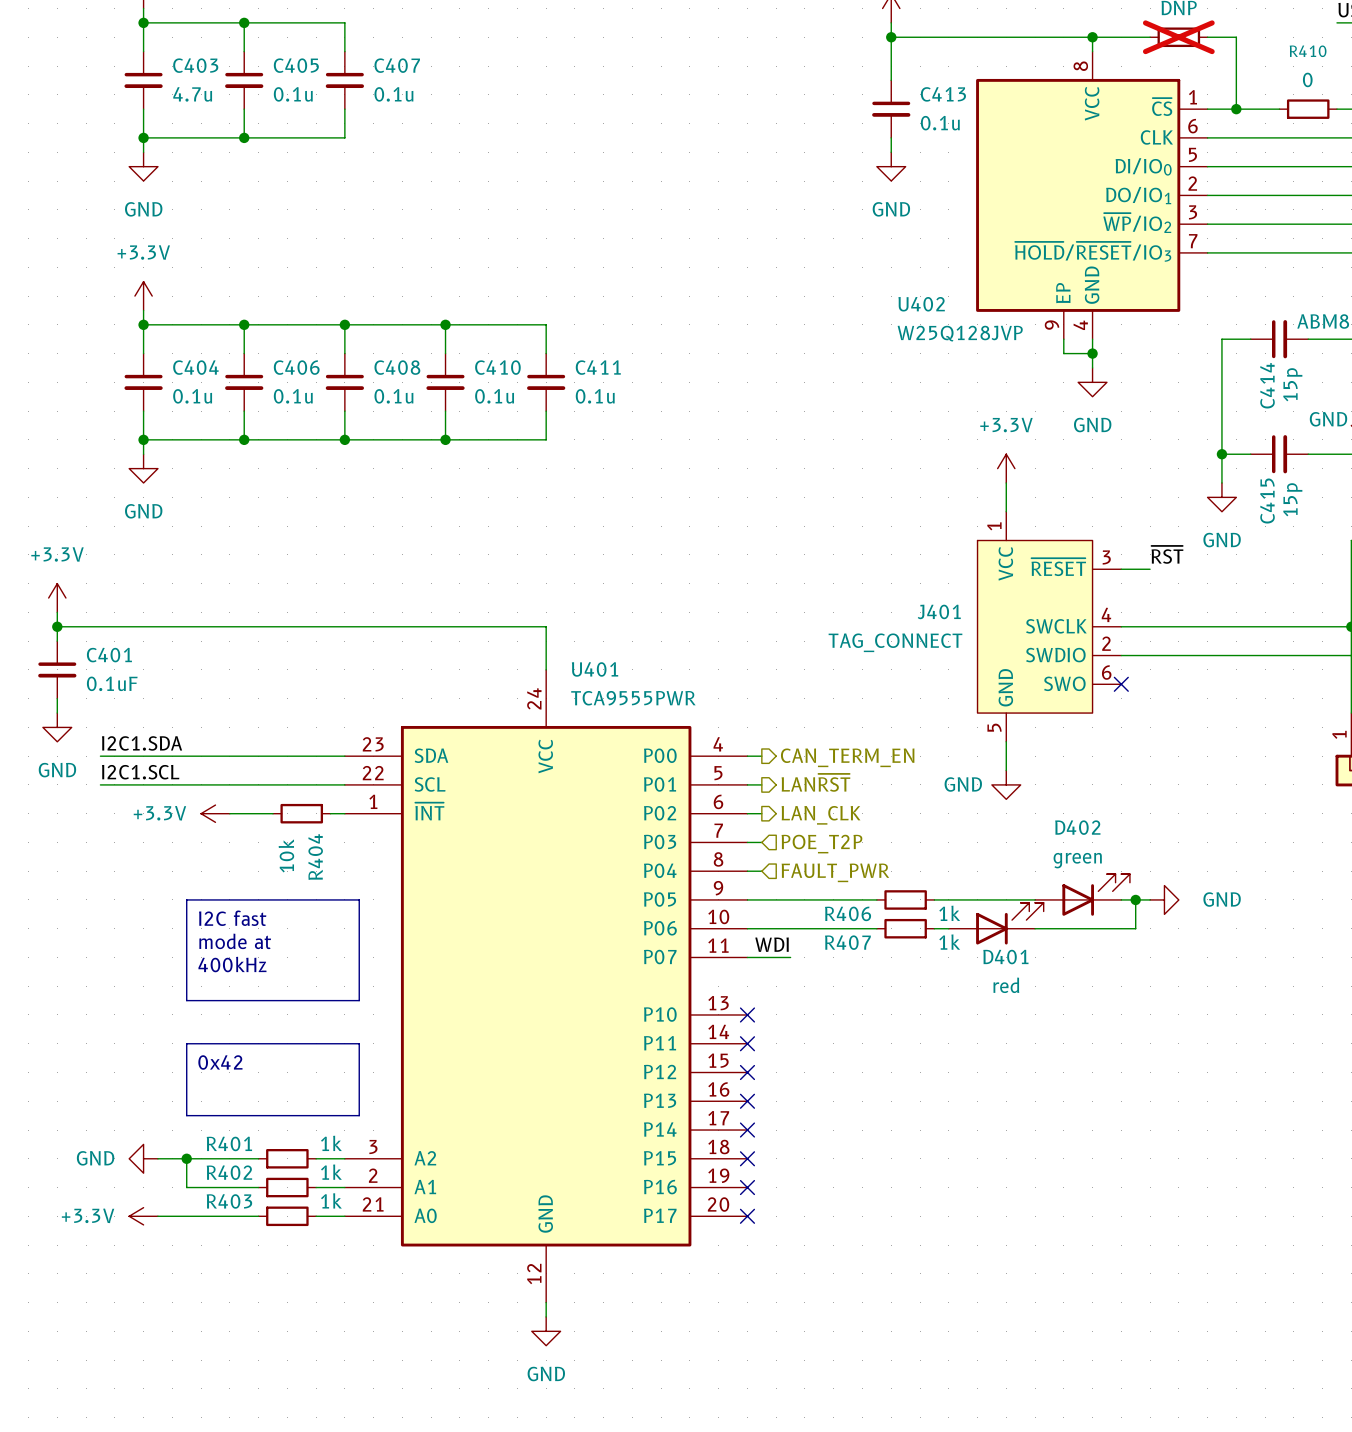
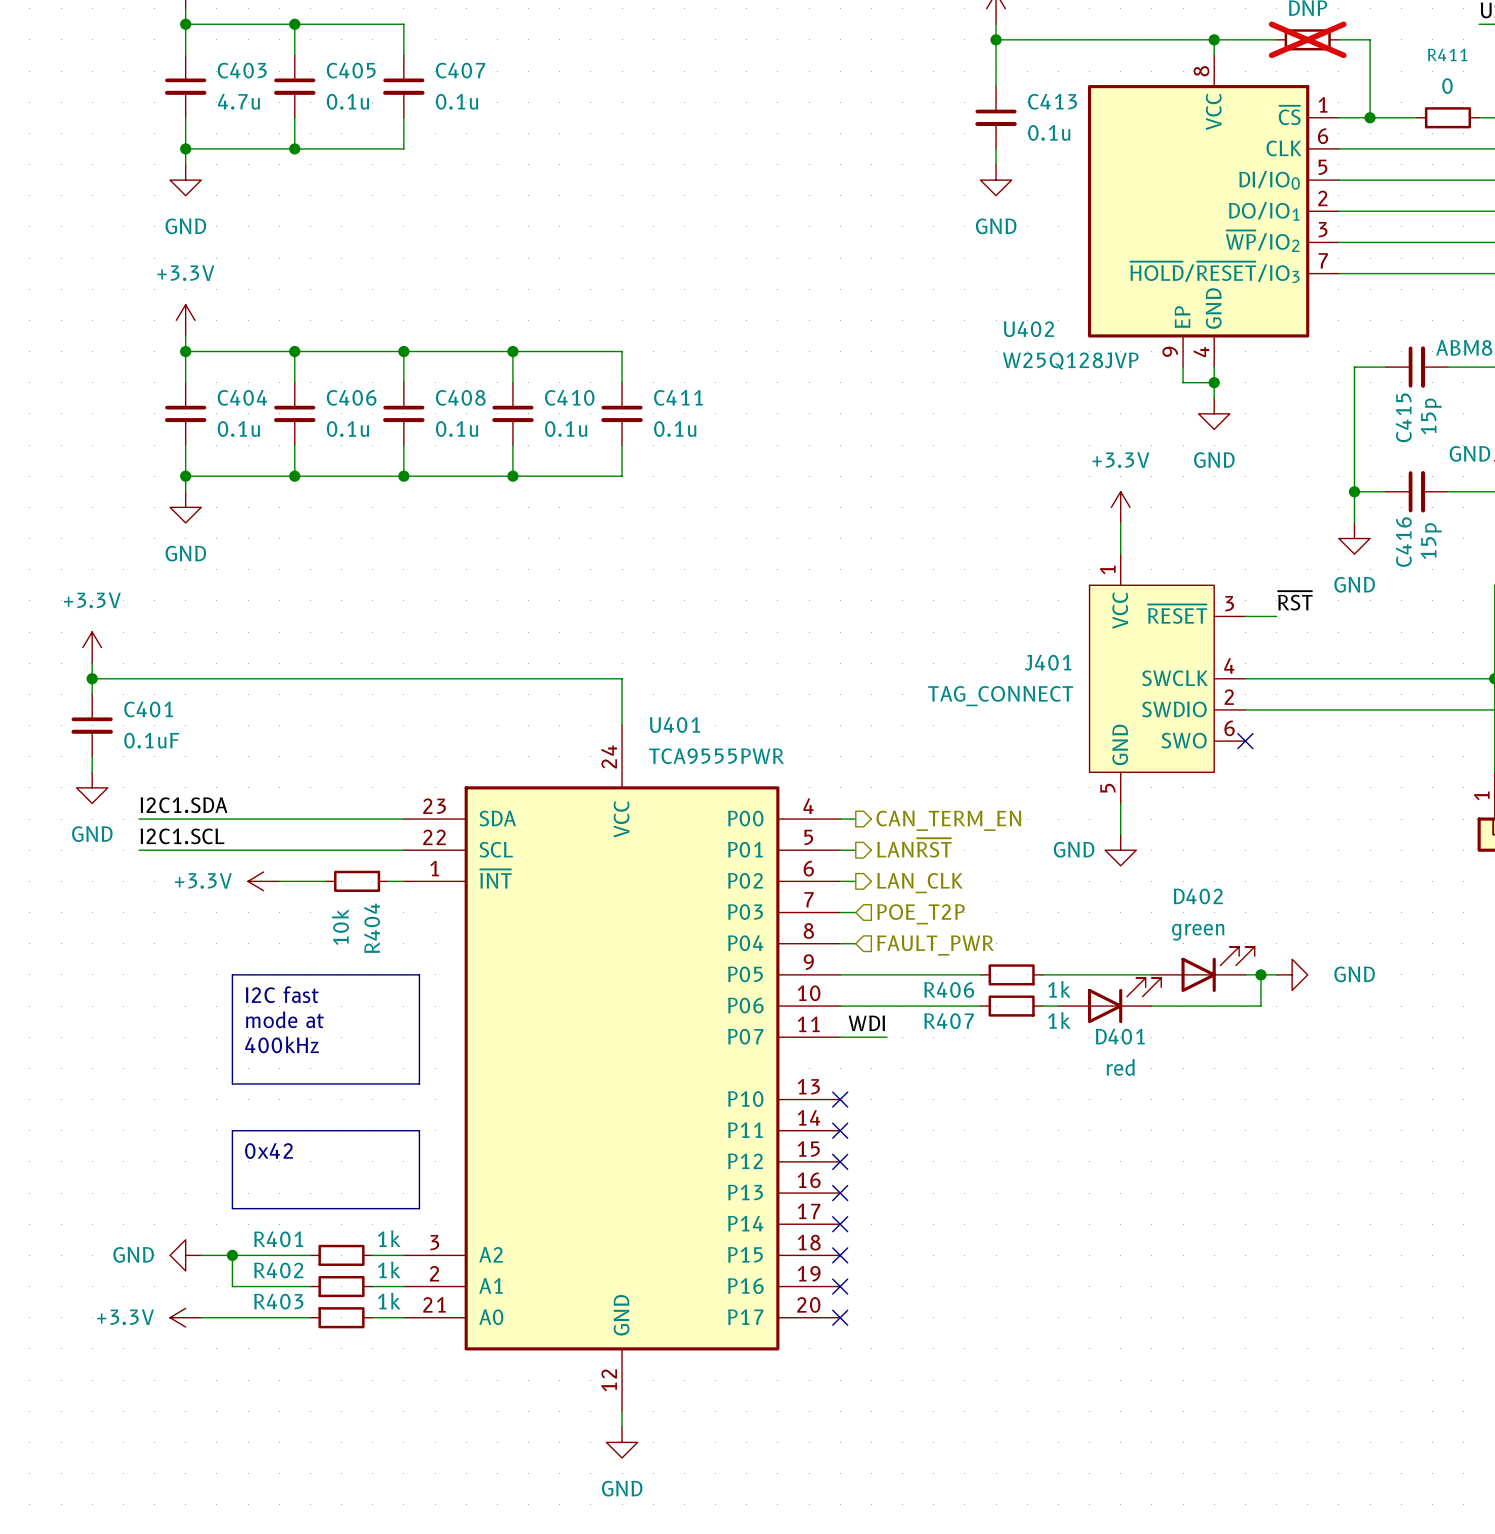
R410 name: R410 (1308, 51) -> R411 (1447, 54)
C414 name: C414 (1267, 385) -> C415 (1403, 417)
C415 name: C415 (1267, 501) -> C416 (1403, 542)

